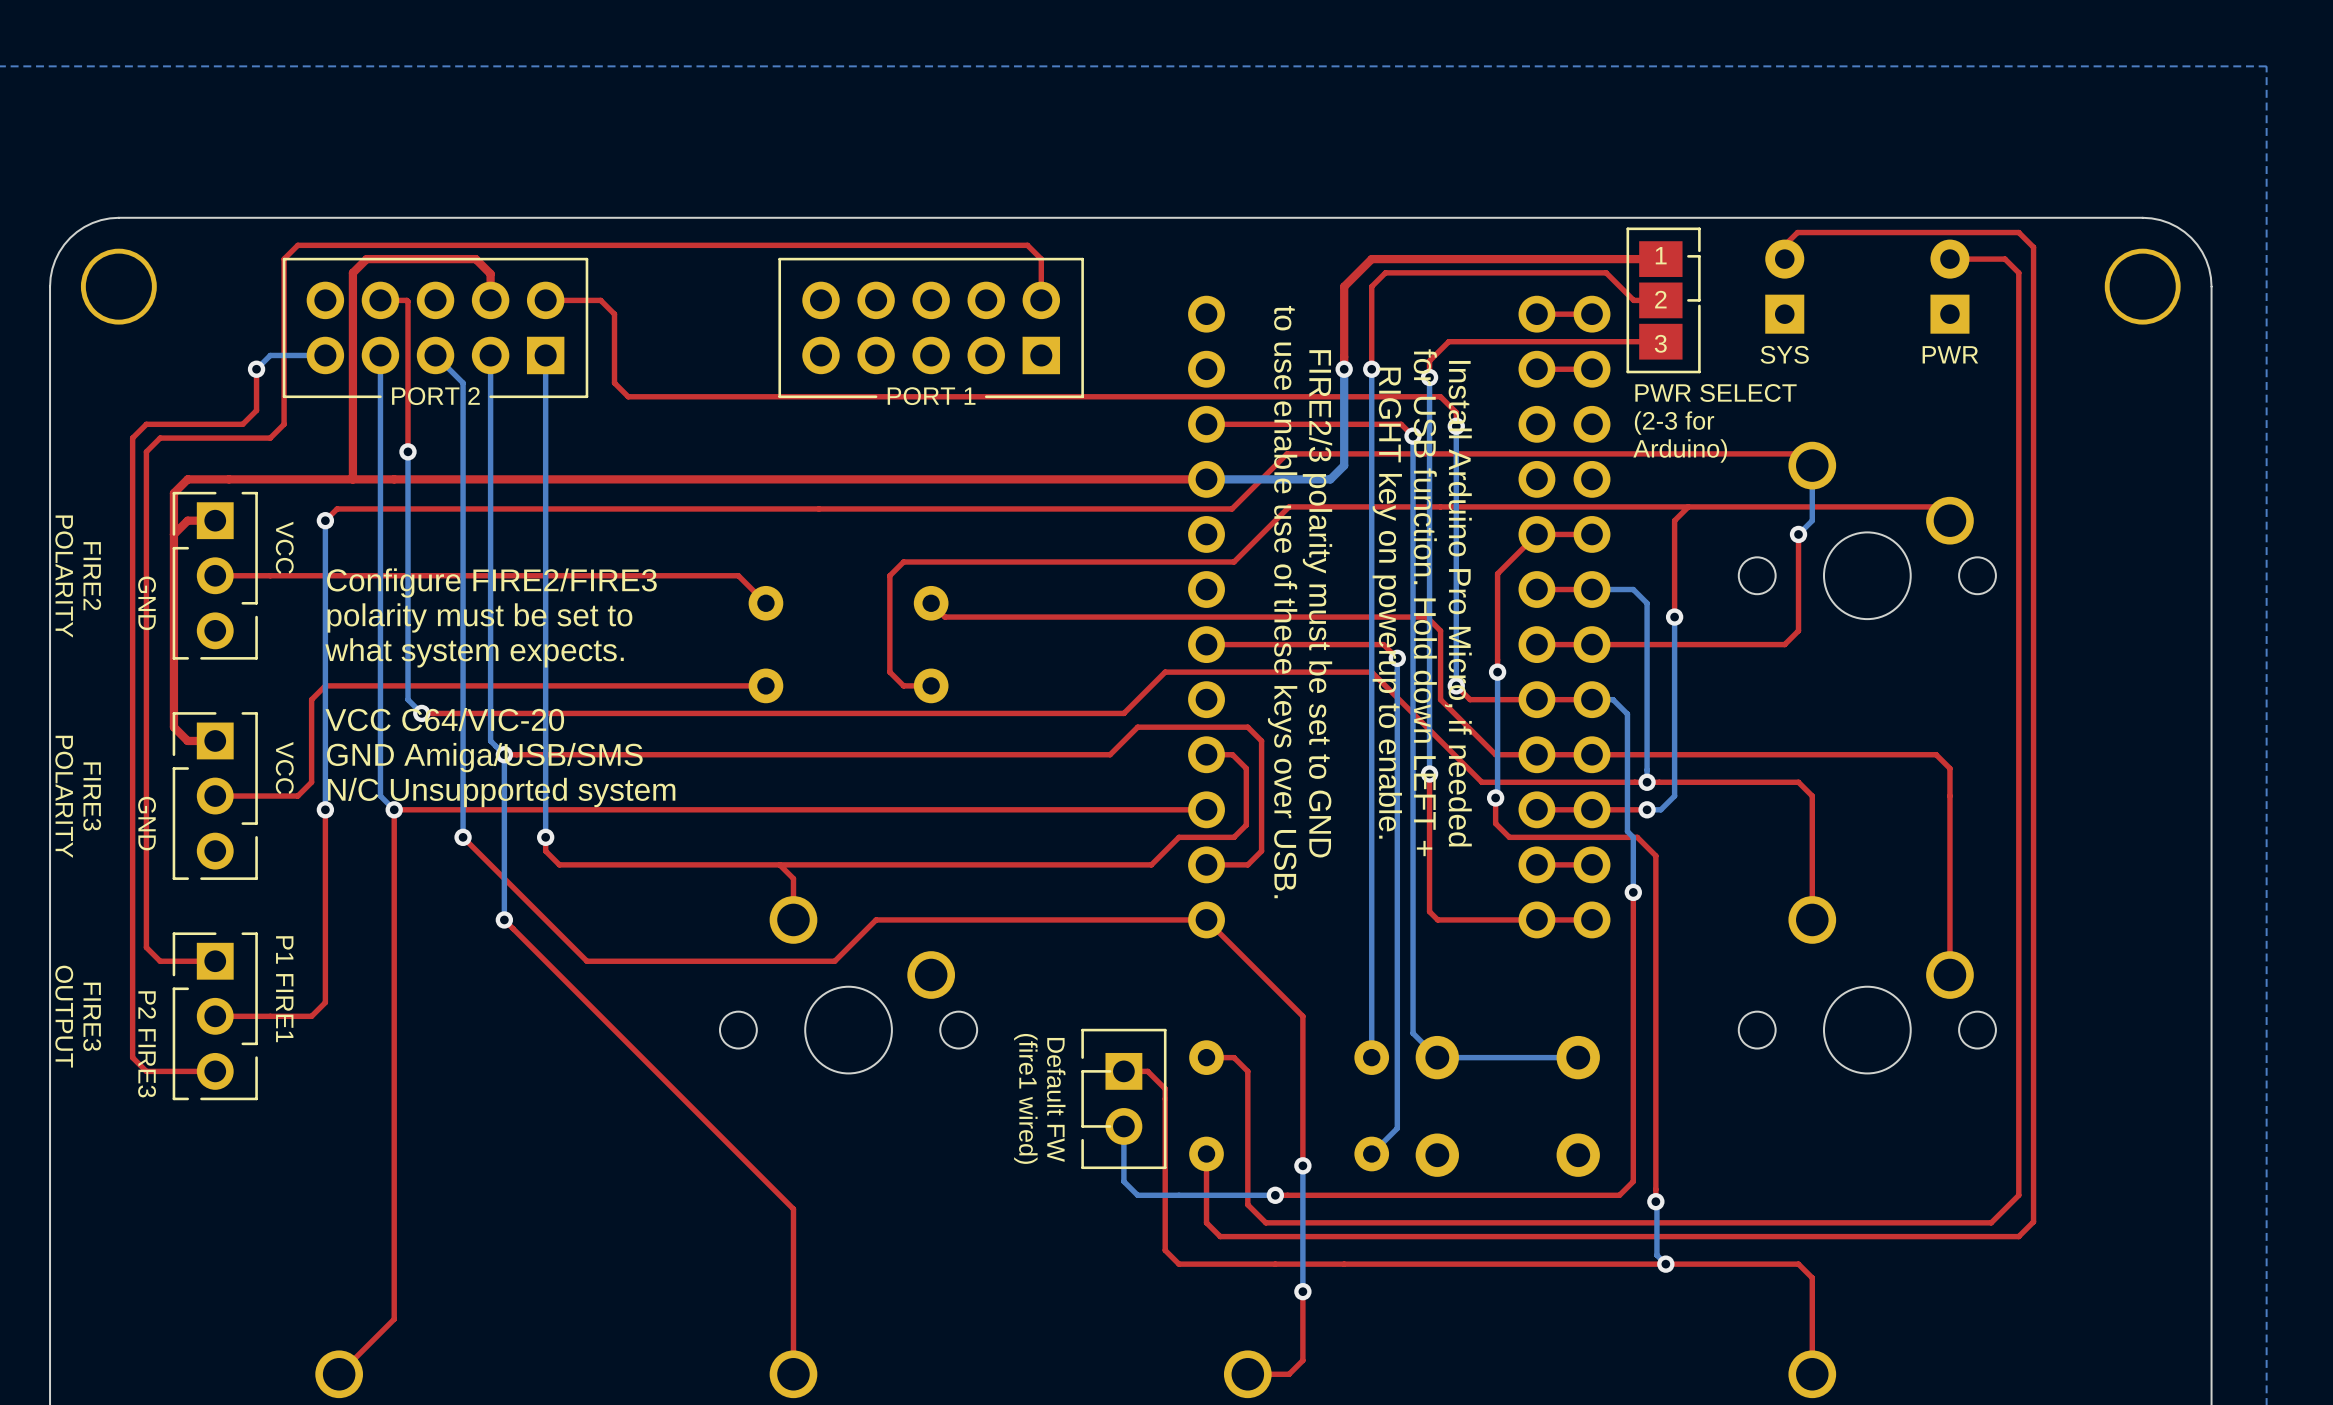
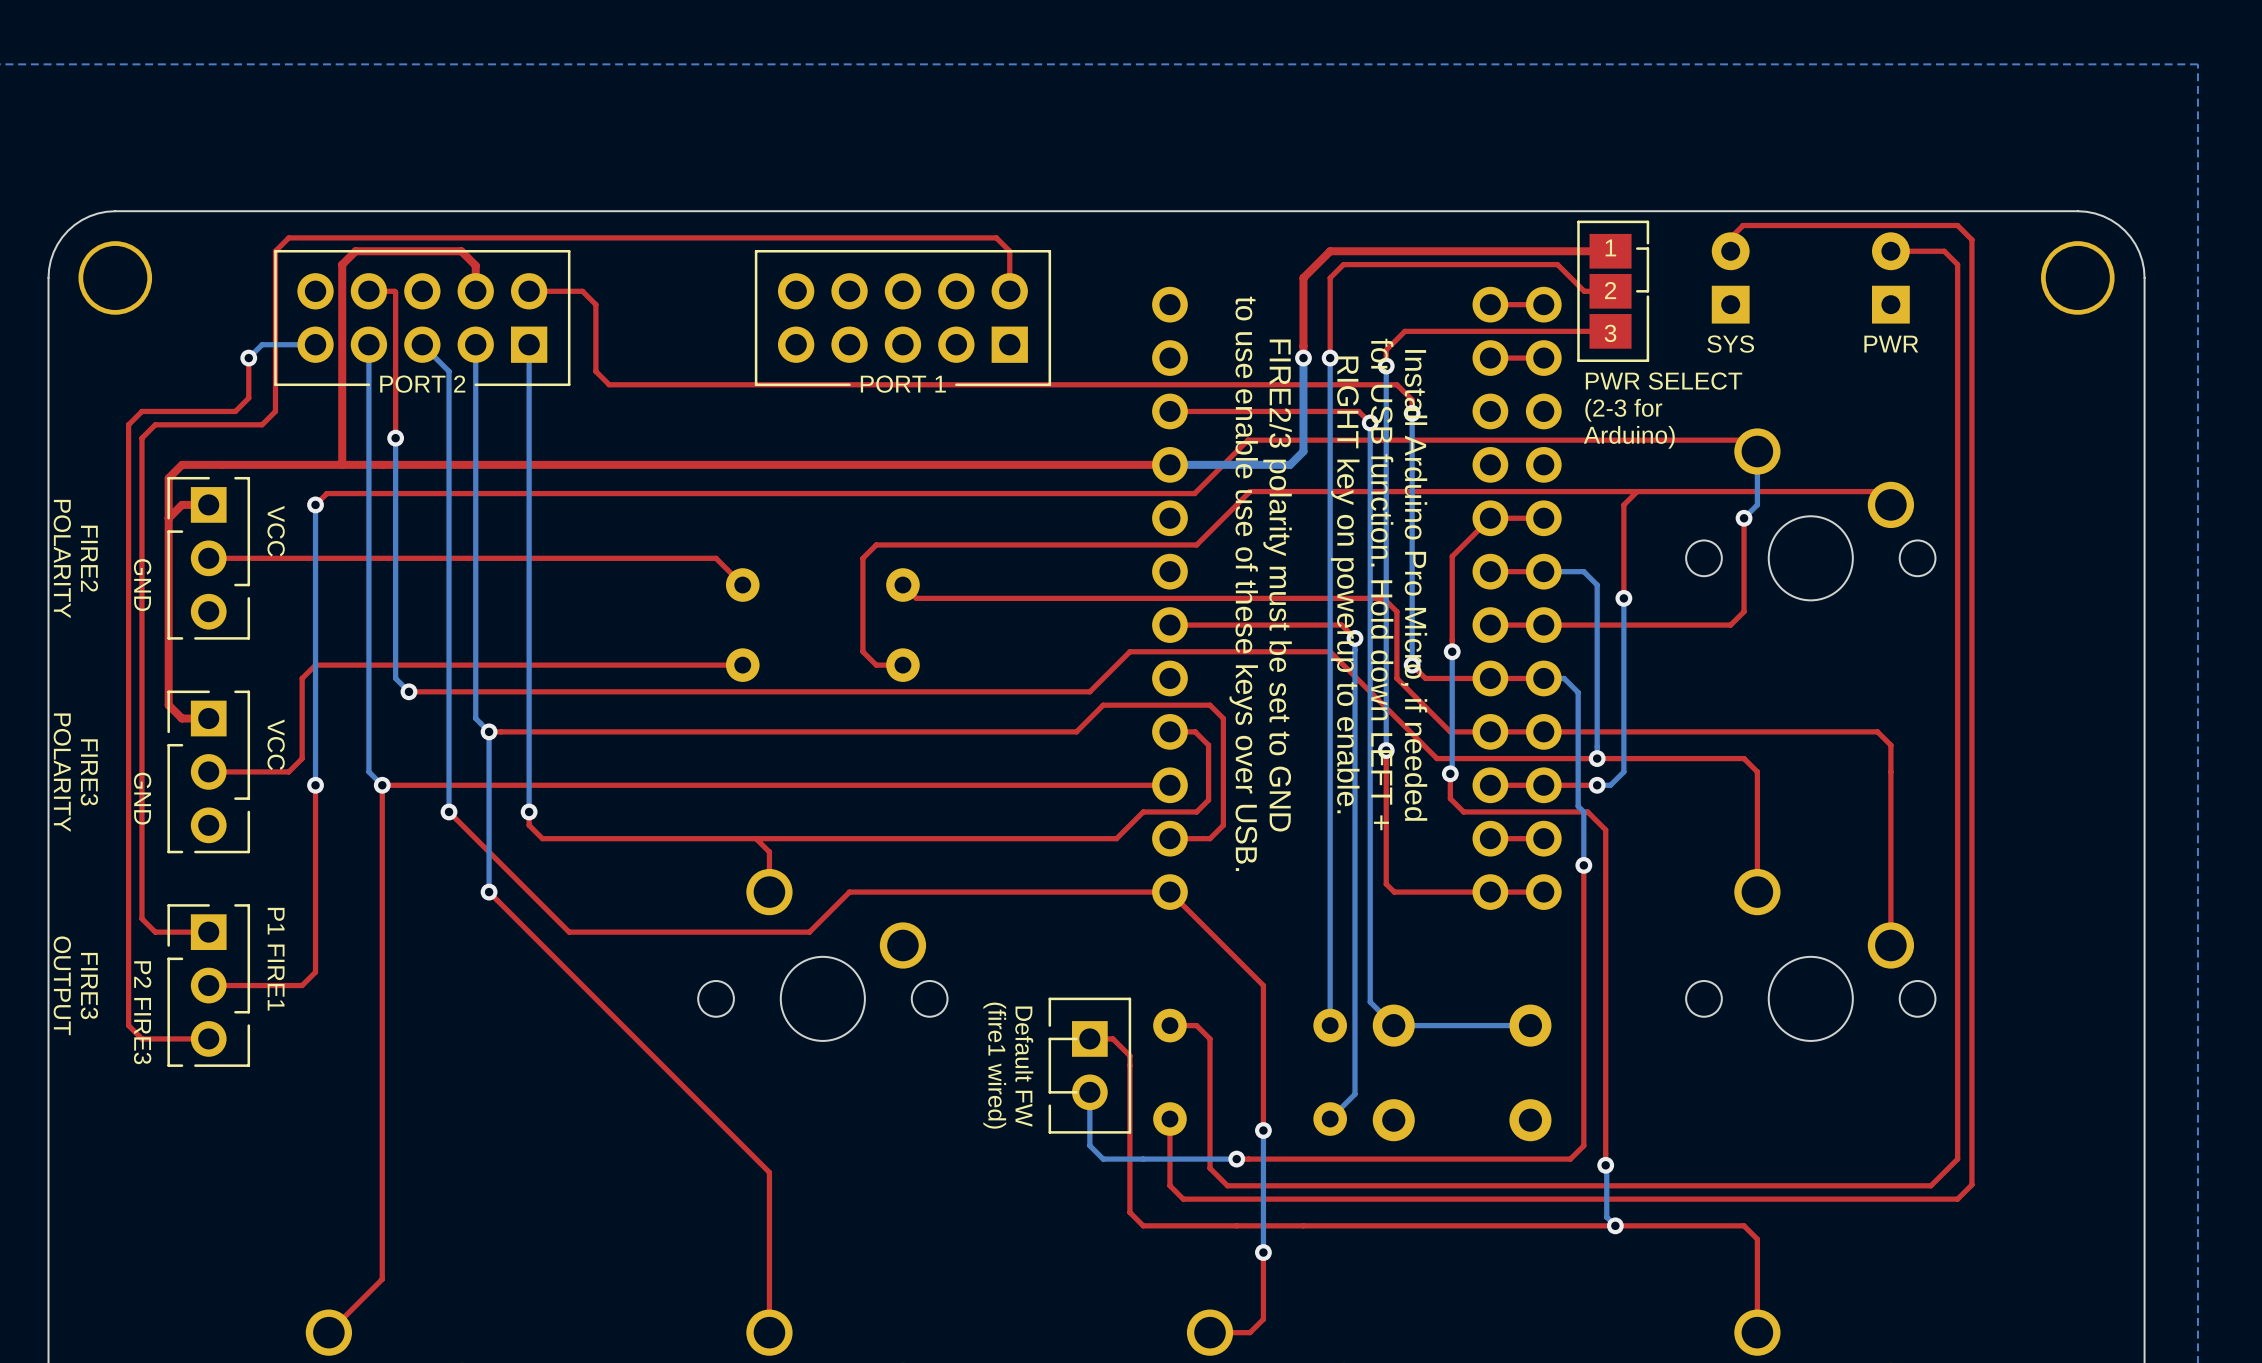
text: Configure FIRE2/FIRE3 (491, 583) -> none
text: polarity must be set to (479, 617) -> none
text: what system expects. (474, 652) -> none
text: VCC C64/VIC-20 (444, 719) -> none
text: GND Amiga/USB/SMS (484, 757) -> none
text: N/C Unsupported system (501, 792) -> none

